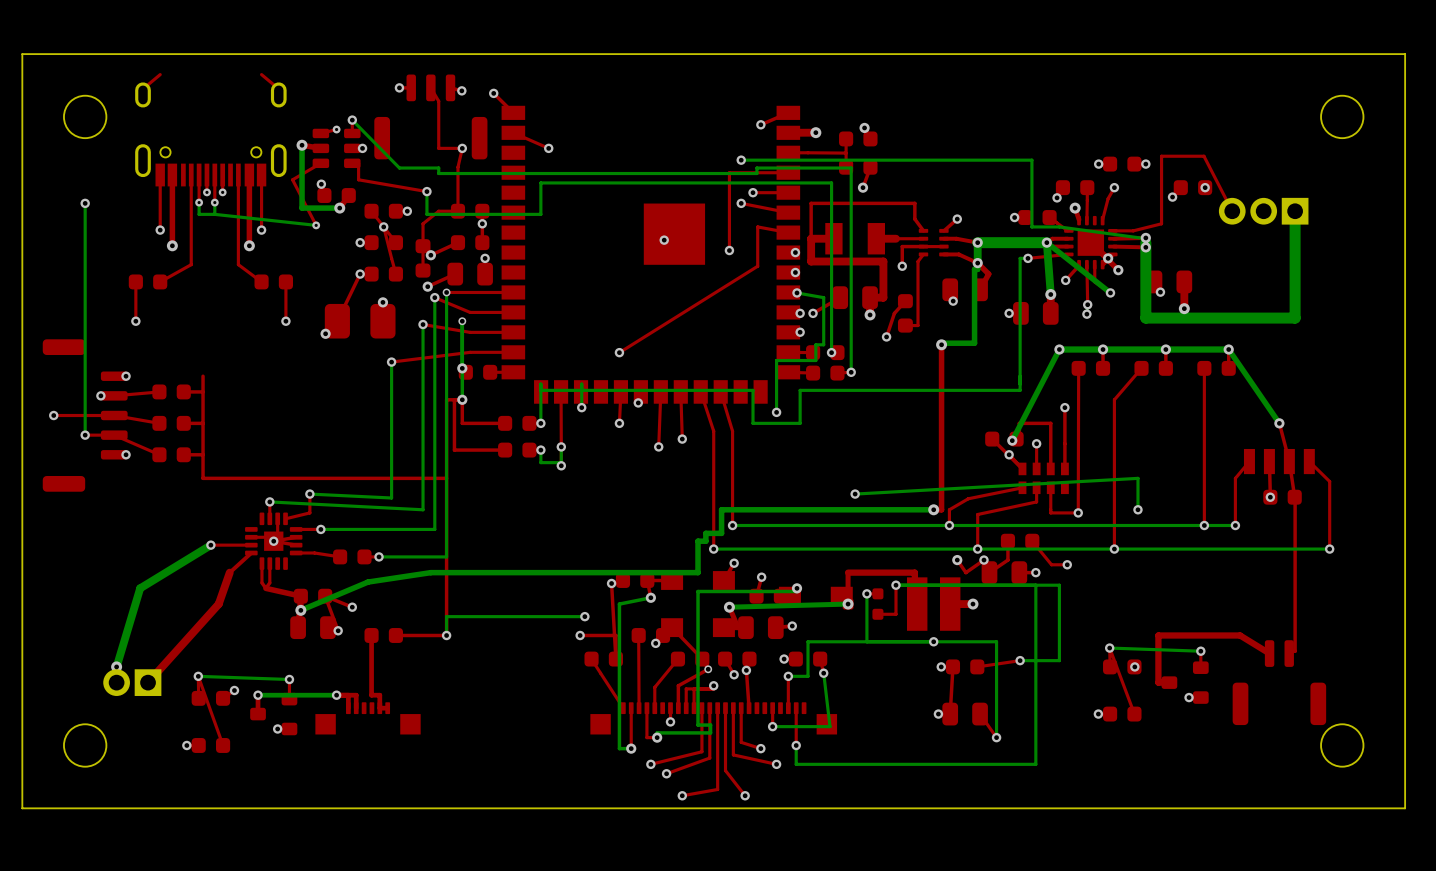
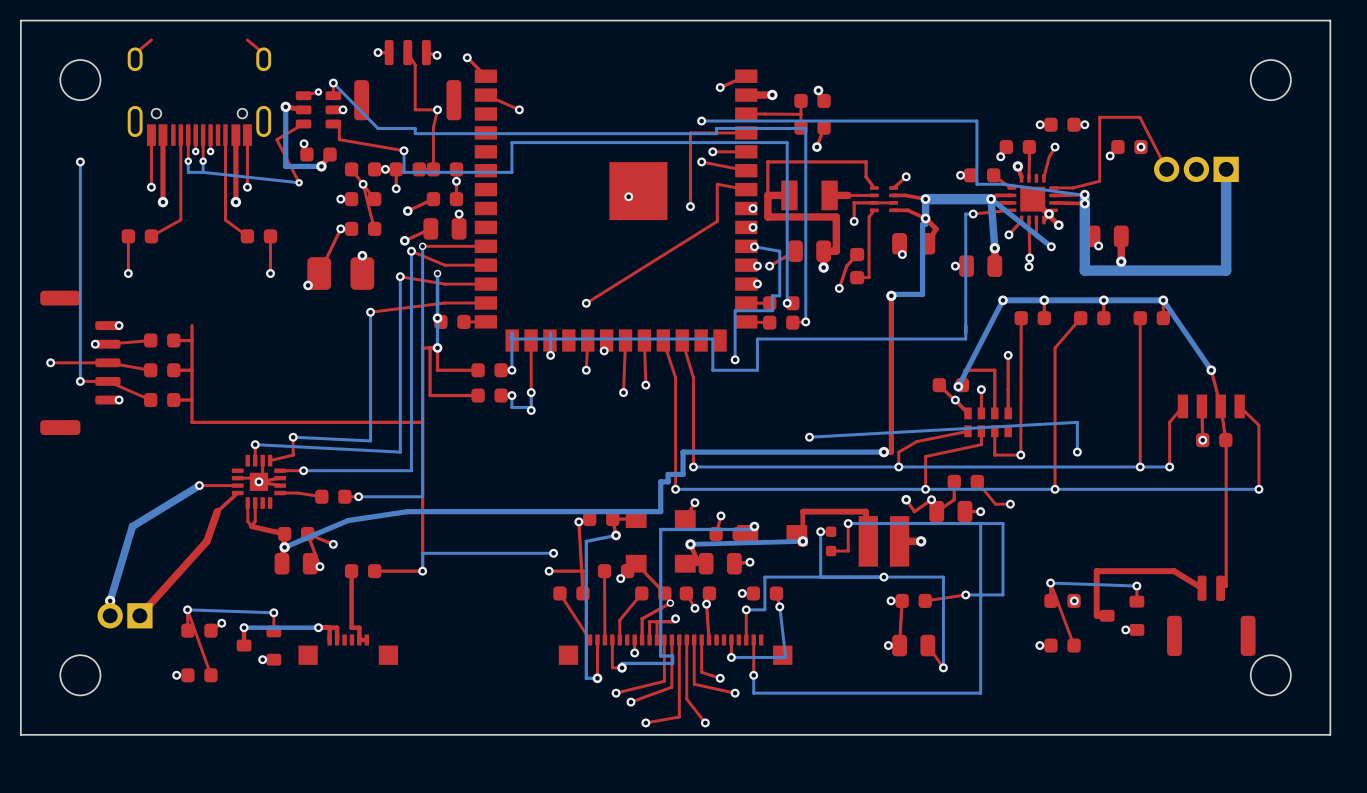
top track: none -> (396, 169) (396, 188)
top track: (443, 211) (438, 211) (423, 223) (423, 270) -> none
via: none -> (396, 188)
part rotation: 0° (423, 258) -> 90° clockwise (407, 169)
part position: (423, 258) -> (407, 169)

